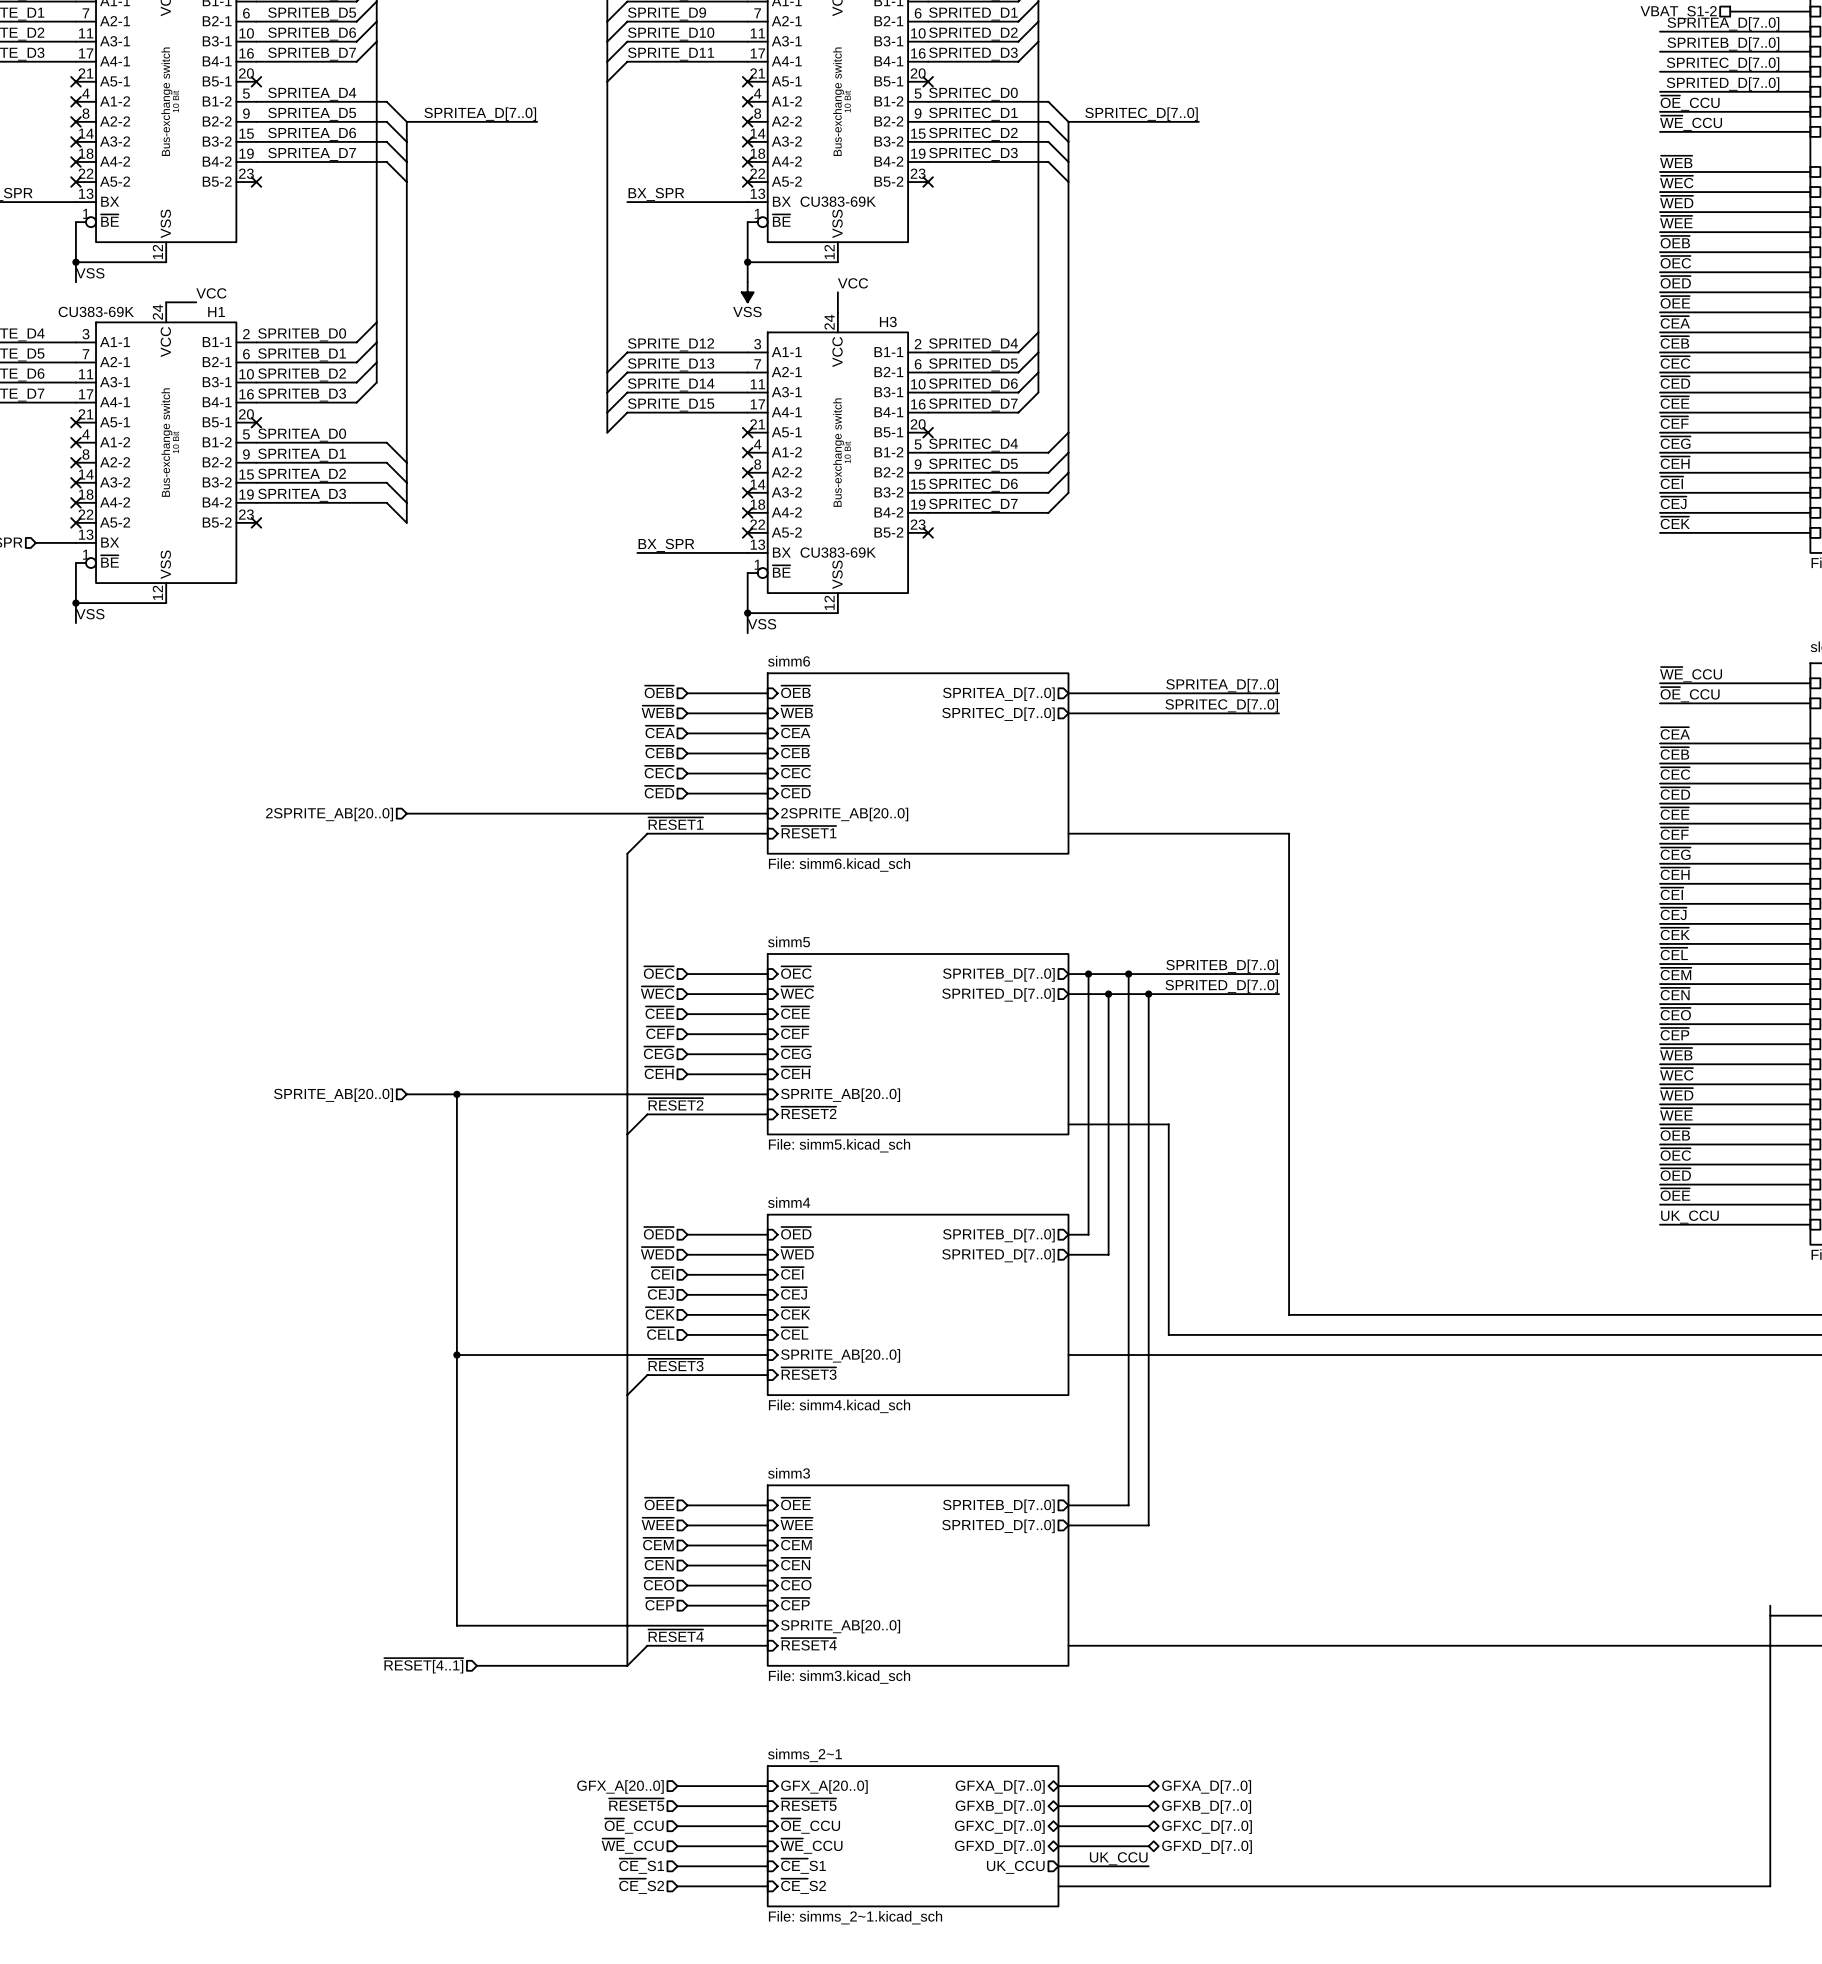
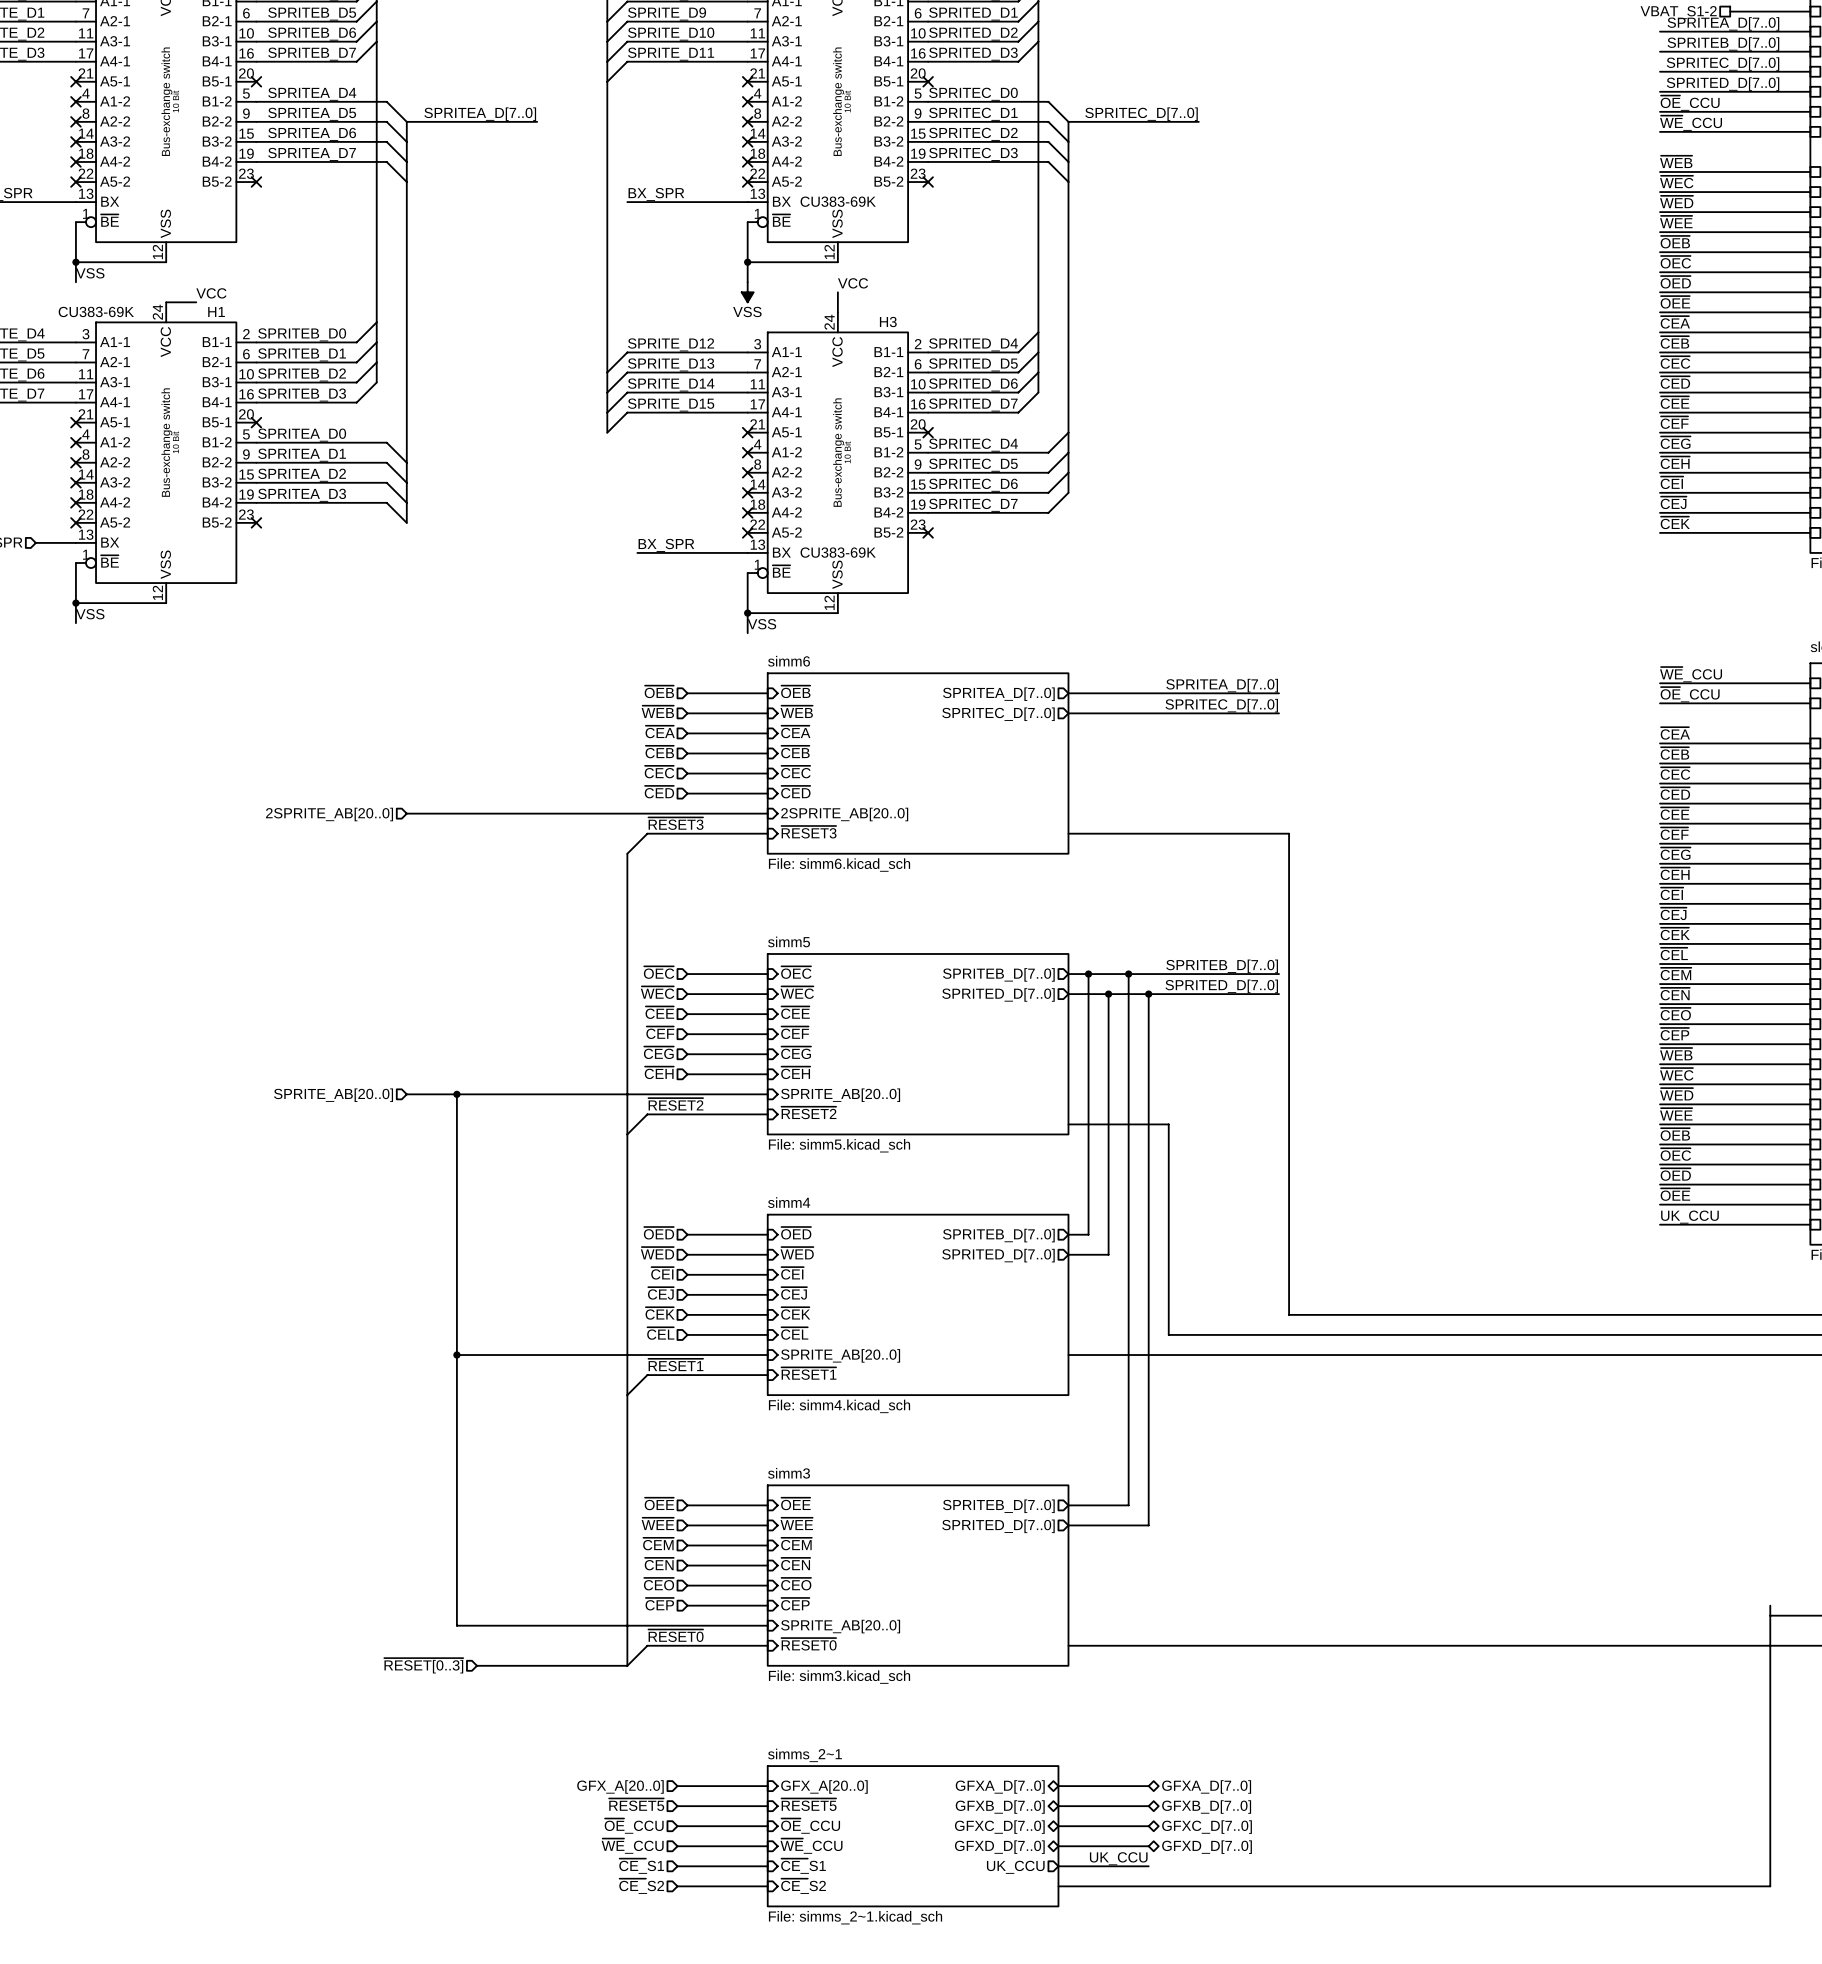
label: ~{RESET1} (675, 823) -> ~{RESET3} (675, 823)
sheet pin: ~{RESET1} (808, 832) -> ~{RESET3} (808, 832)
label: ~{RESET3} (675, 1365) -> ~{RESET1} (675, 1365)
sheet pin: ~{RESET3} (808, 1373) -> ~{RESET1} (808, 1373)
label: ~{RESET4} (676, 1635) -> ~{RESET0} (675, 1635)
sheet pin: ~{RESET4} (809, 1644) -> ~{RESET0} (809, 1644)
hierarchical label: ~{RESET[4..1]} (423, 1665) -> ~{RESET[0..3]} (423, 1665)

